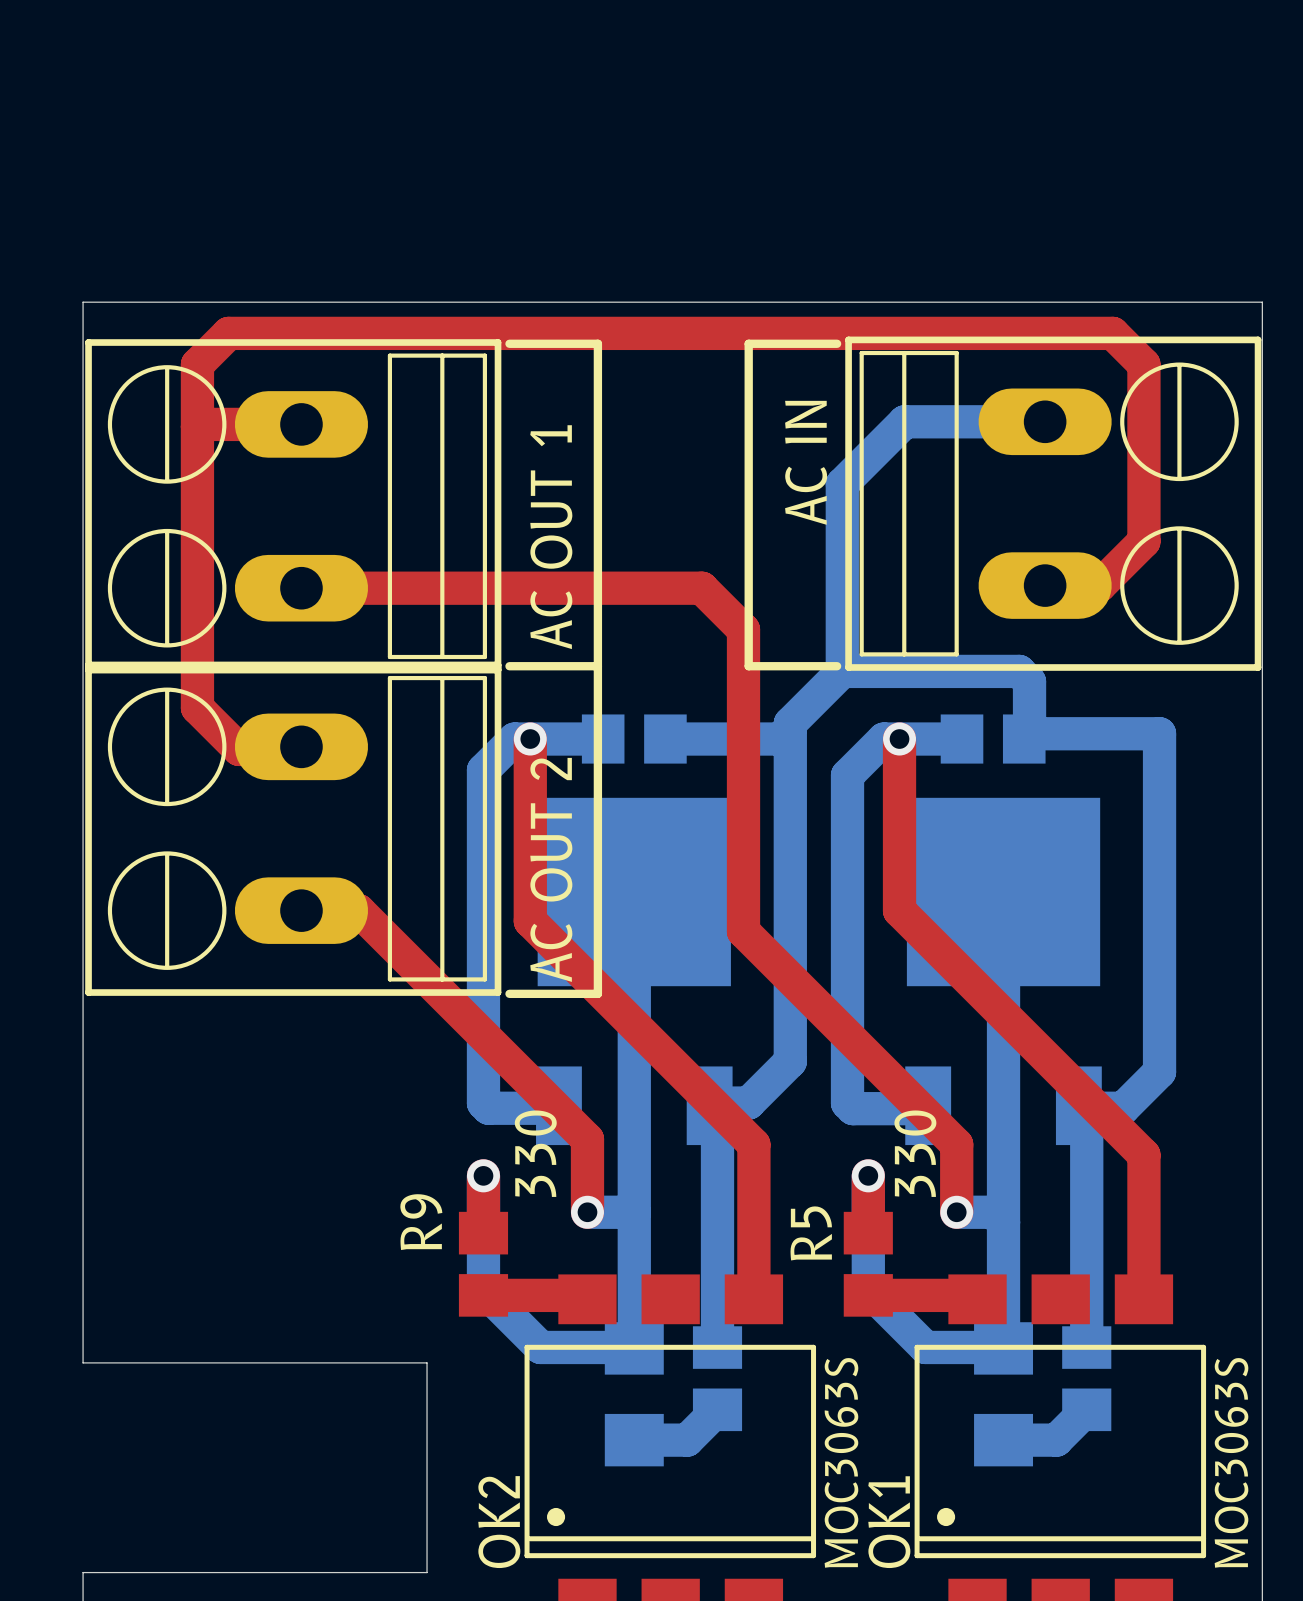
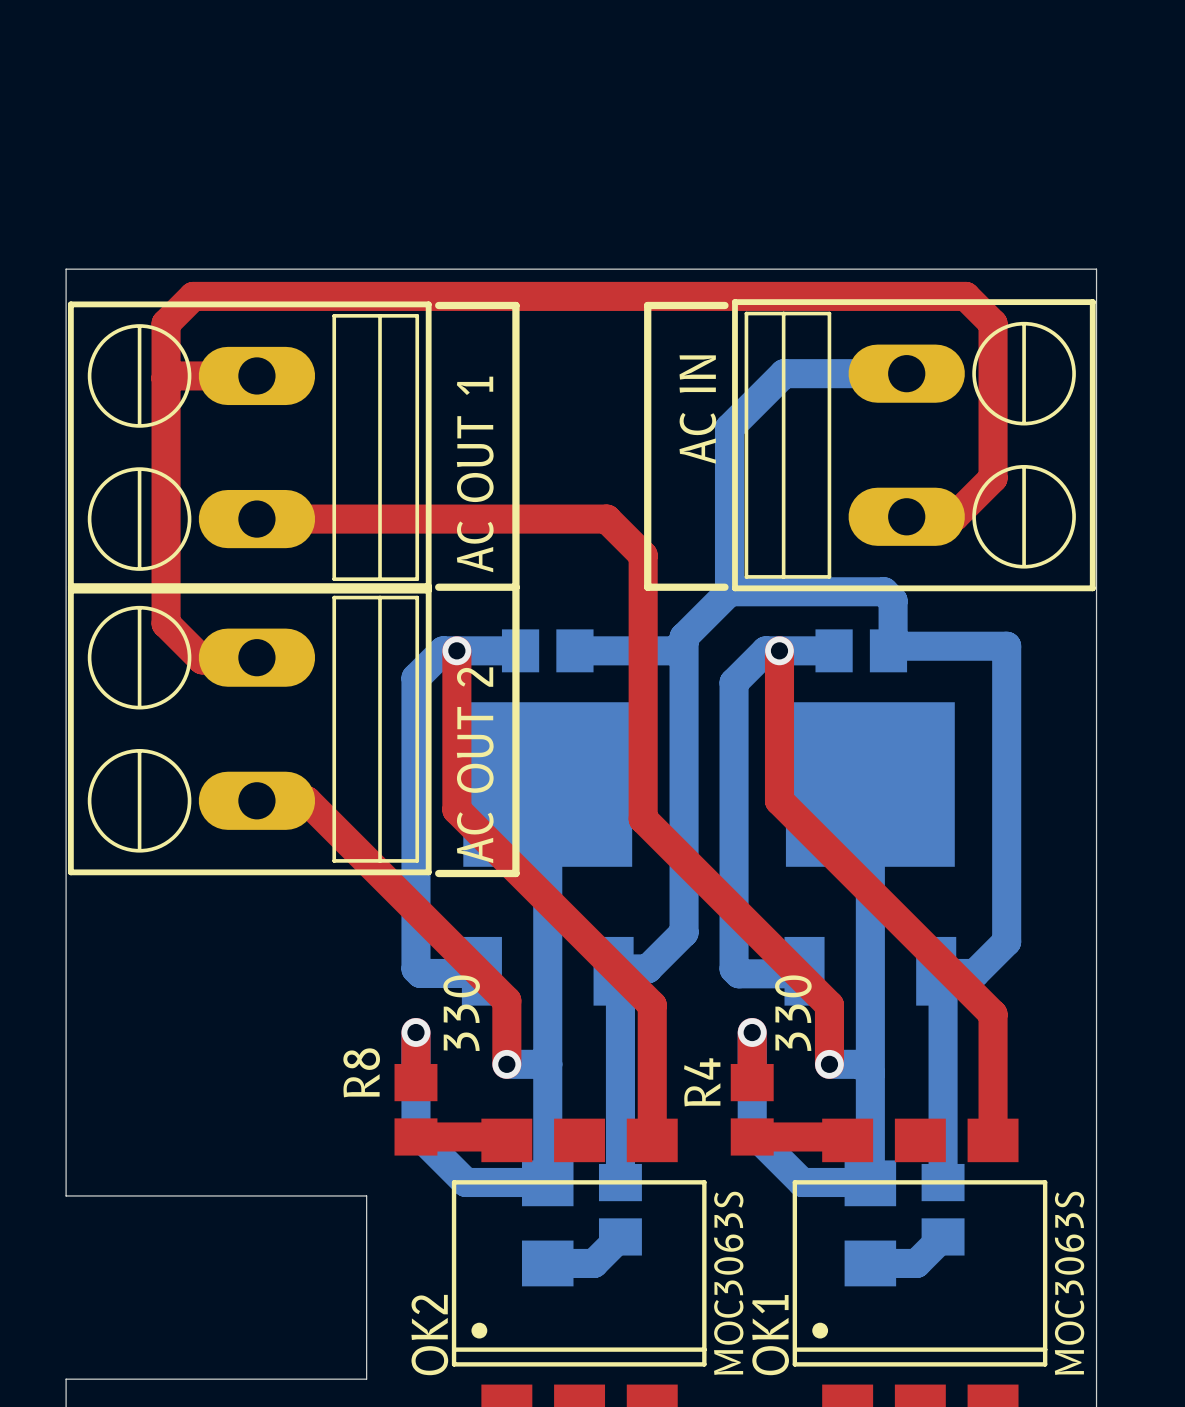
R9 name: R9 (421, 1222) -> R8 (361, 1072)
R5 name: R5 (811, 1233) -> R4 (702, 1082)

